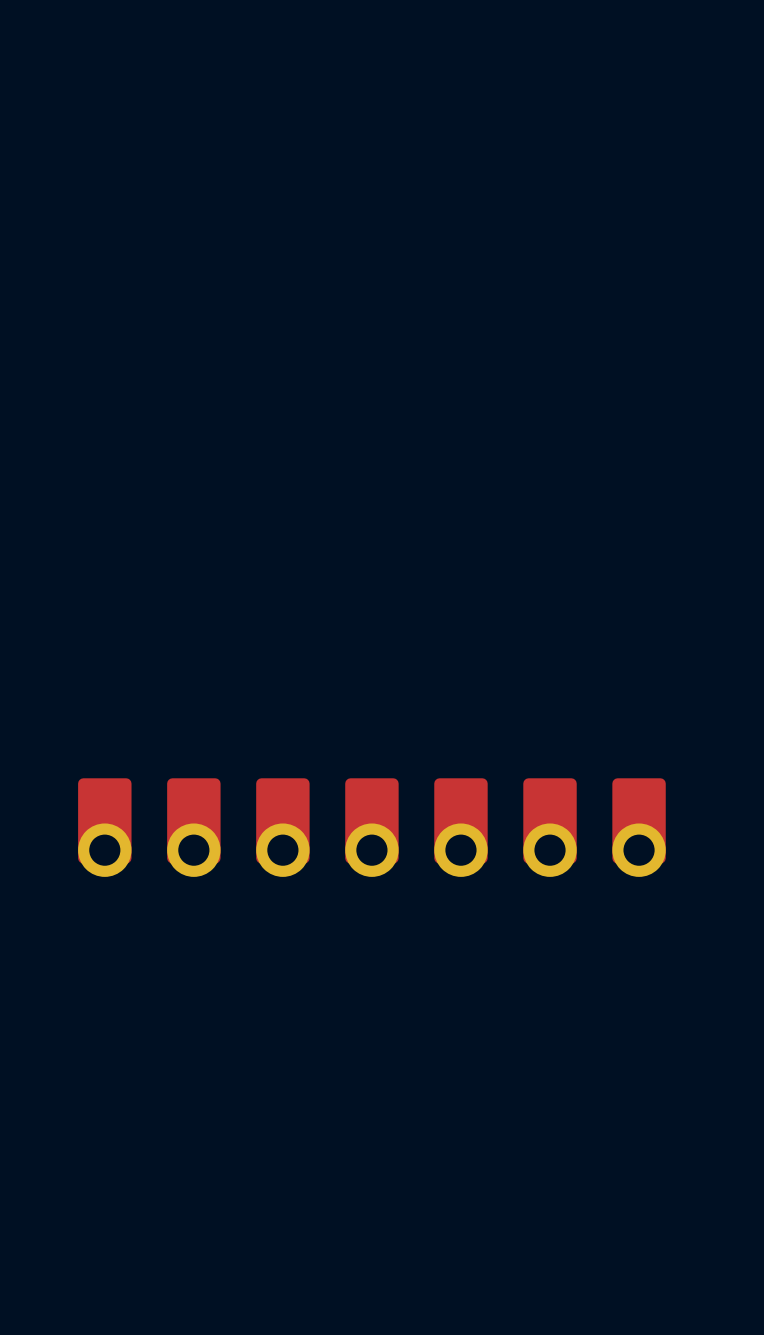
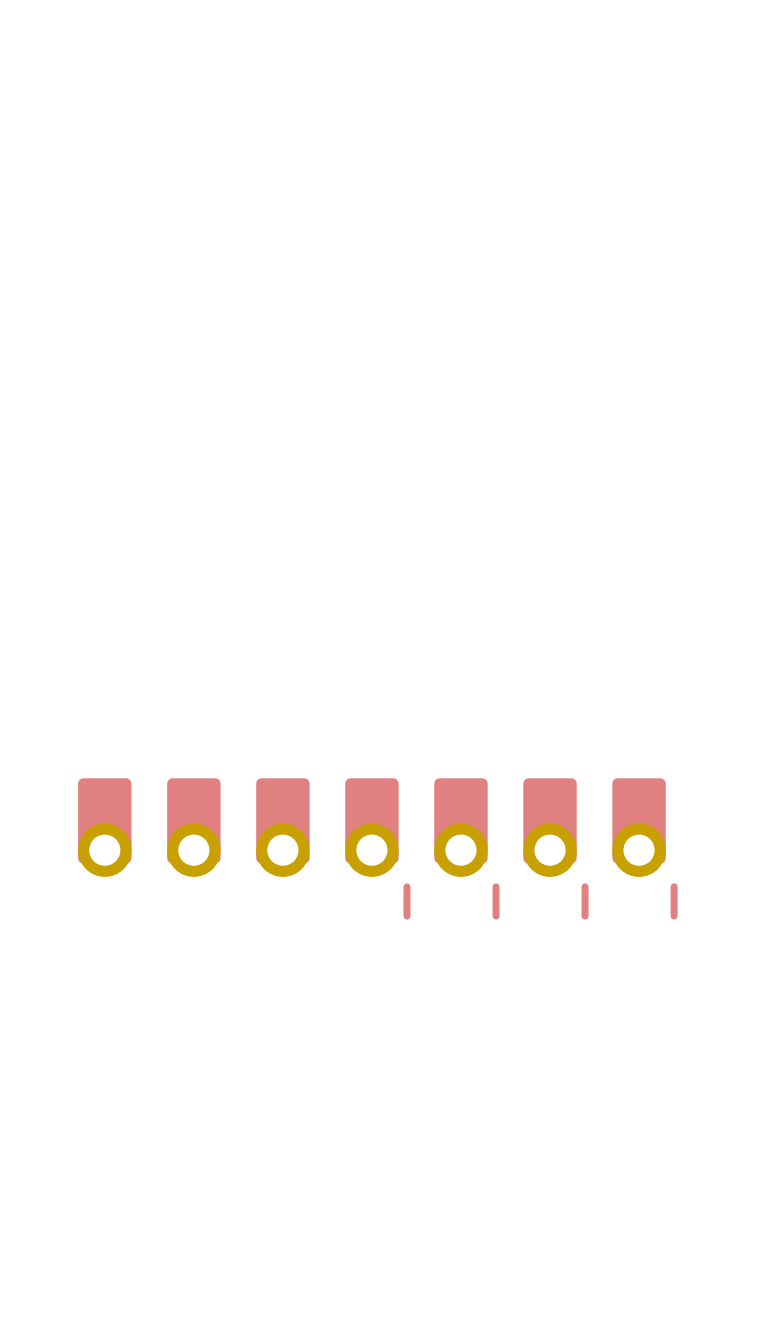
top track: none -> (406, 886) (406, 916)
top track: none -> (496, 886) (496, 916)
top track: none -> (585, 886) (585, 916)
top track: none -> (674, 886) (674, 916)

